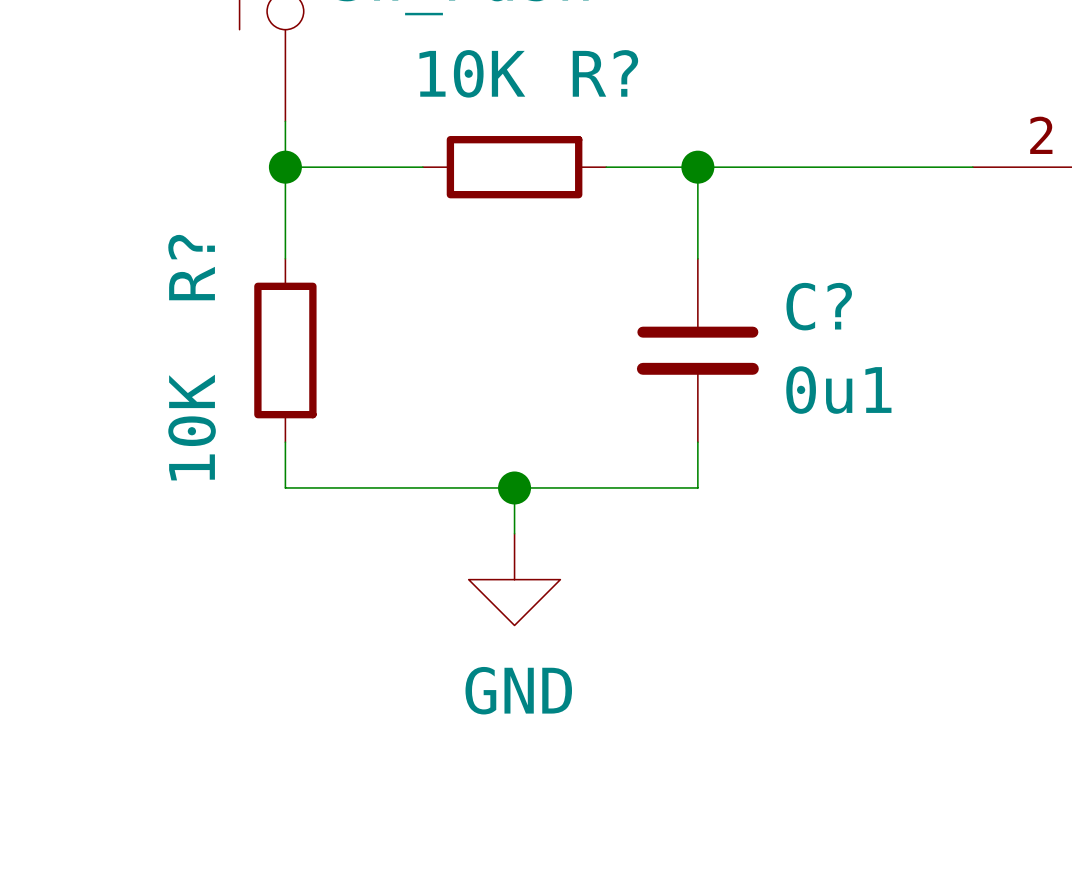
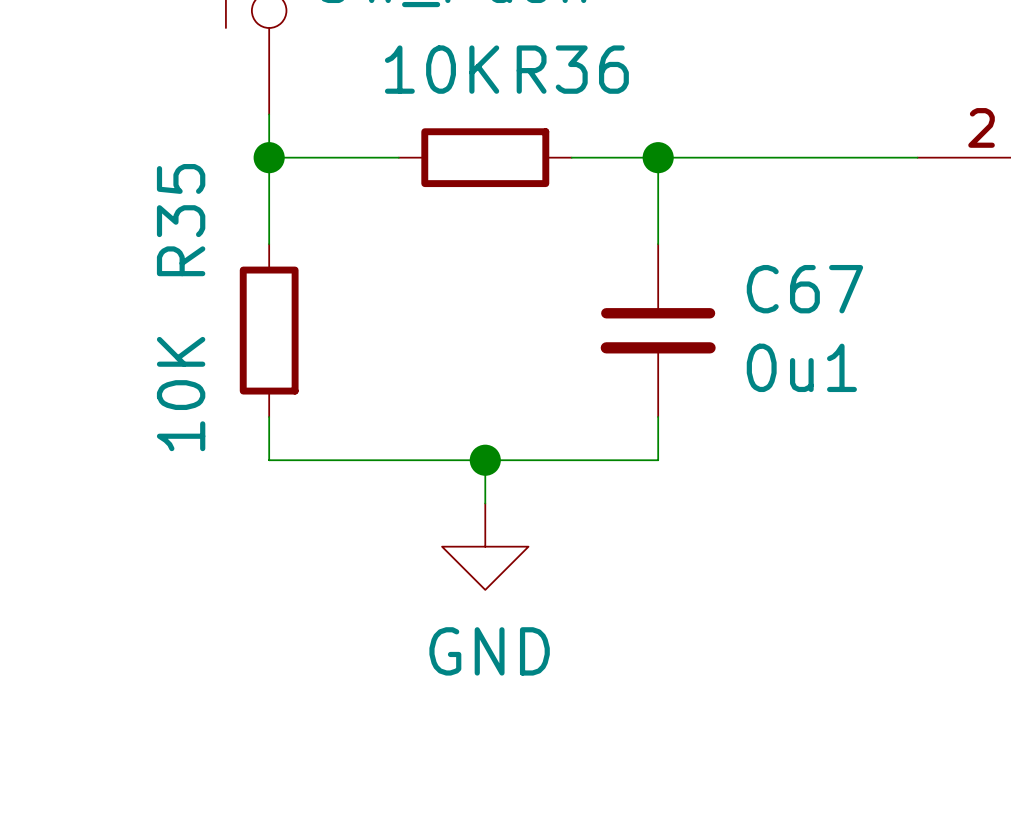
R? name: R? (605, 73) -> R36 (572, 69)
R? name: R? (191, 267) -> R35 (181, 220)
C? name: C? (819, 306) -> C67 (804, 289)

